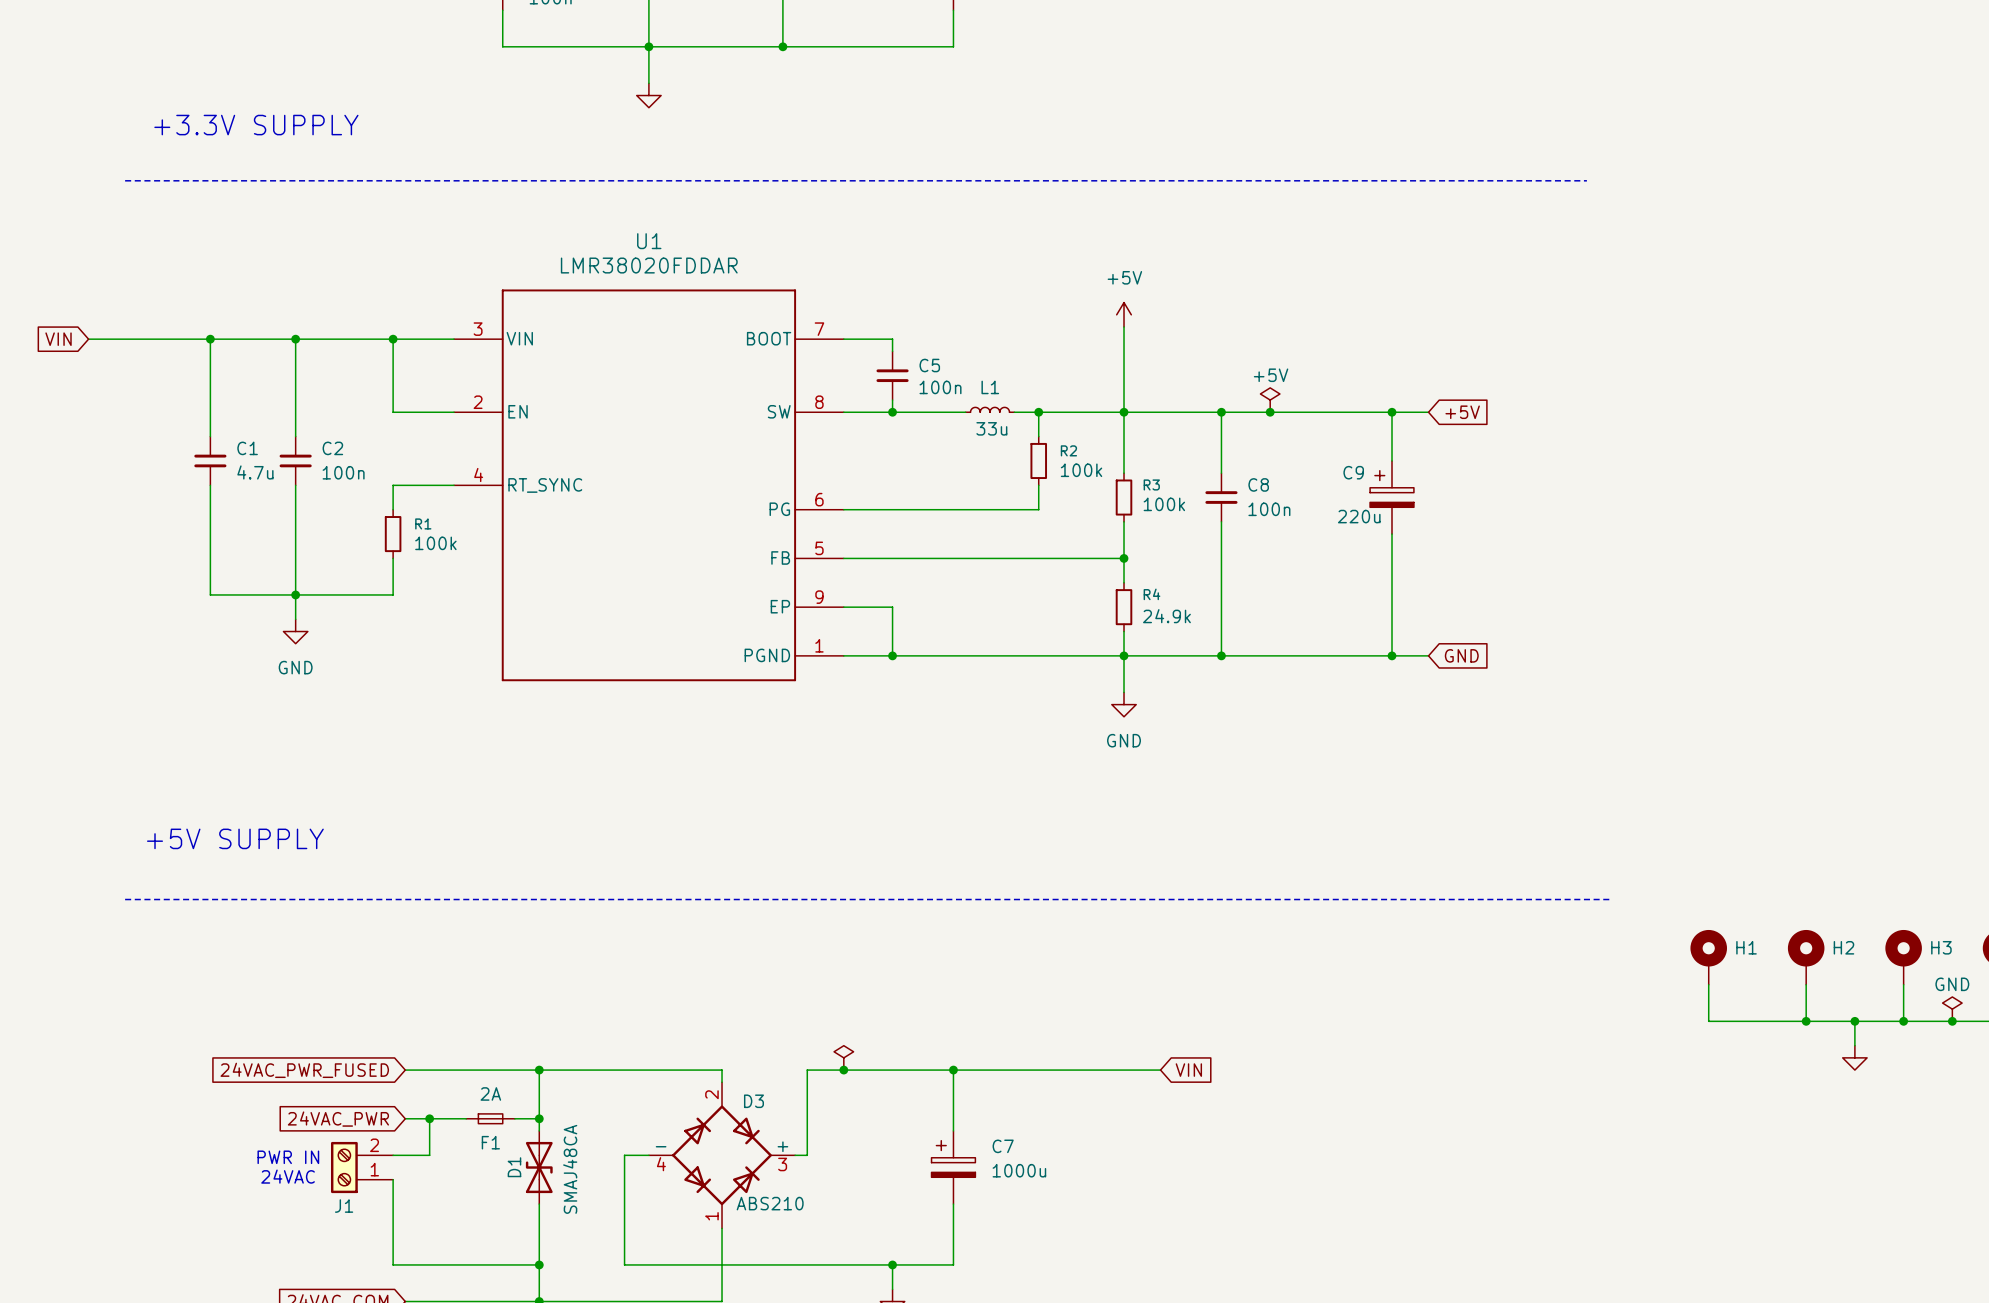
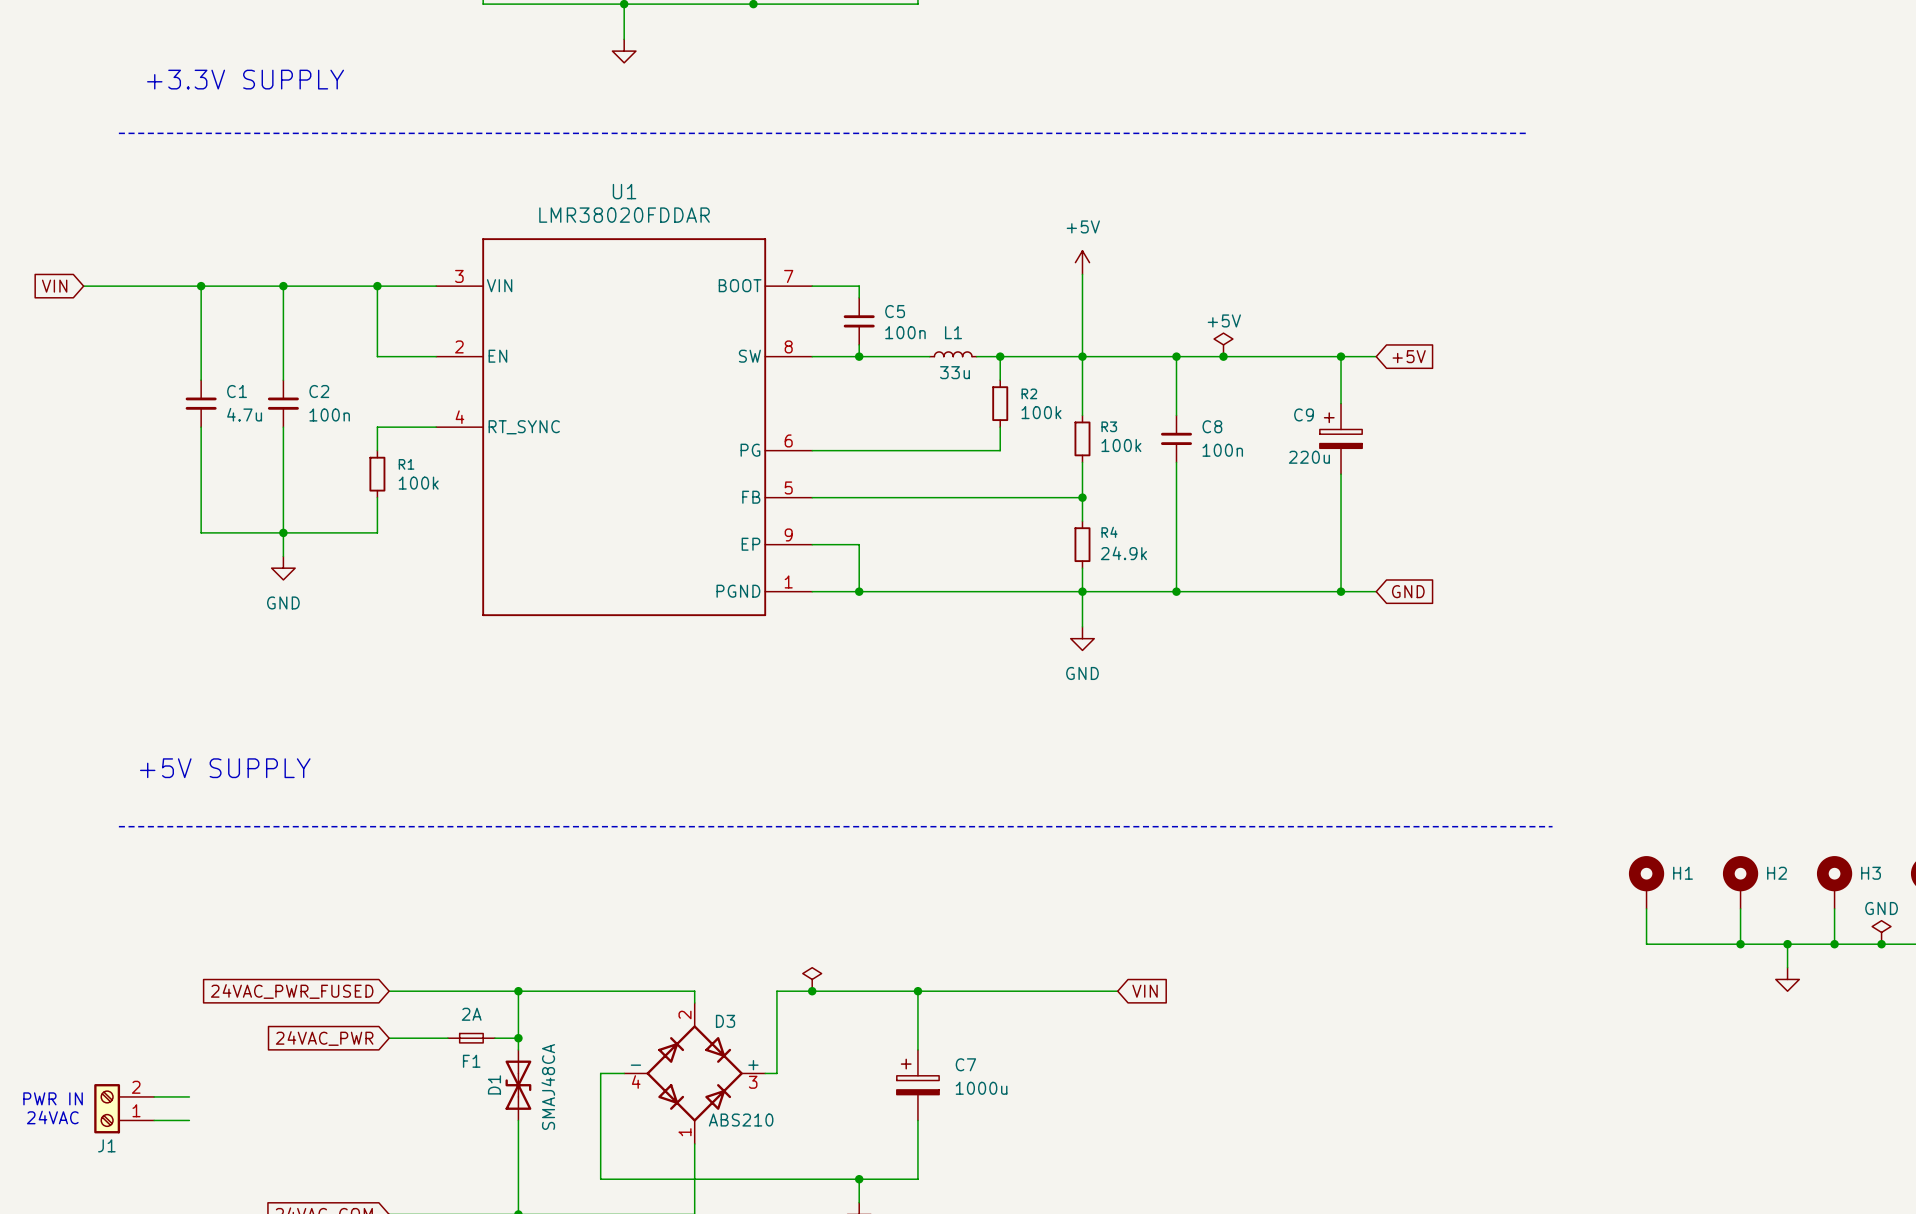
wire: (429, 1118) (429, 1155) (393, 1155) -> none
junction: (429, 1118) -> none
text position: PWR IN (288, 1157) -> PWR IN (53, 1098)
J1 position: (362, 1167) -> (124, 1108)
text position: 24VAC (288, 1176) -> 24VAC (52, 1117)
wire: none -> (154, 1096) (189, 1096)
wire: (393, 1179) (393, 1264) (539, 1264) -> none
wire: none -> (154, 1120) (189, 1120)
junction: (539, 1264) -> none

